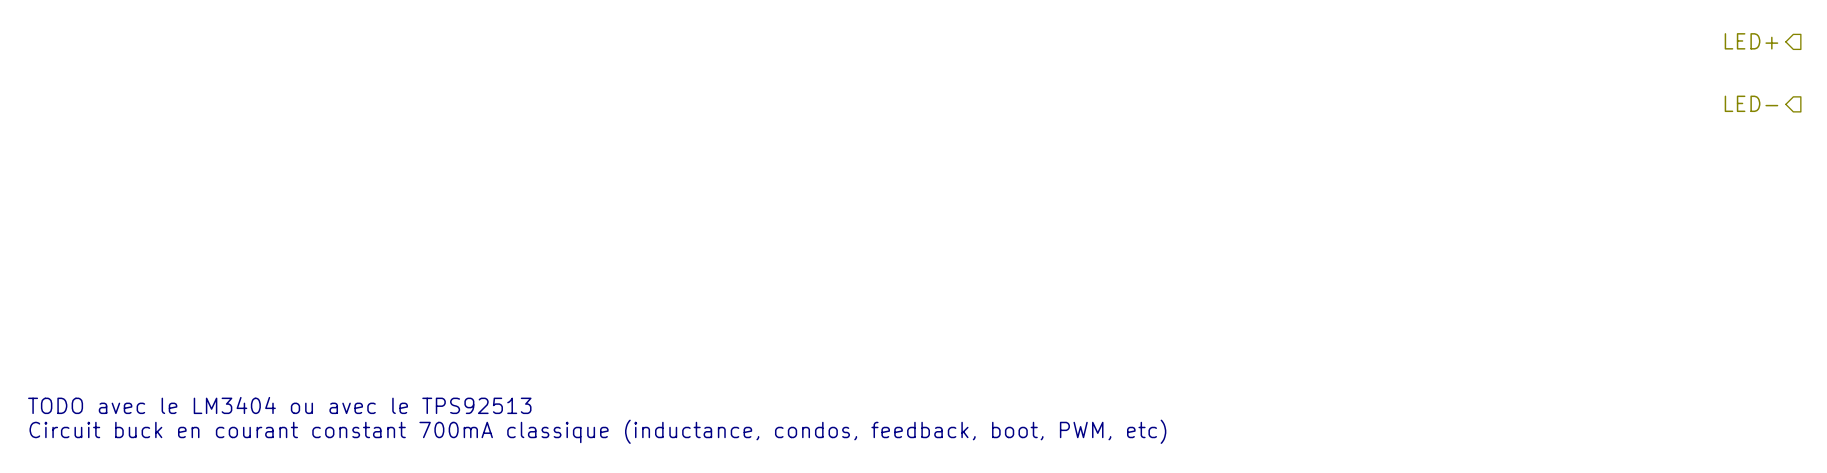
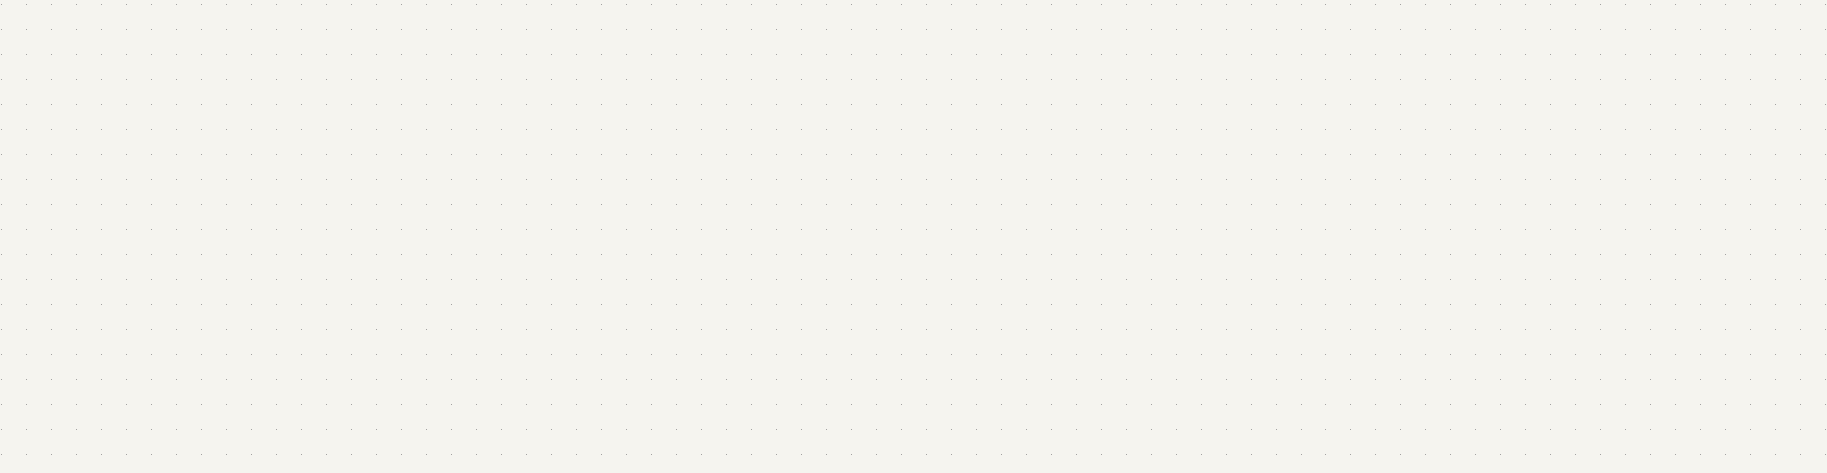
hierarchical label: LED+ (1751, 41) -> none
hierarchical label: LED- (1751, 103) -> none
text: TODO avec le LM3404 ou avec le TPS92513 (279, 405) -> none
text: Circuit buck en courant constant 700mA classique (inductance, condos, feedback, boot, PWM, etc) (597, 431) -> none

